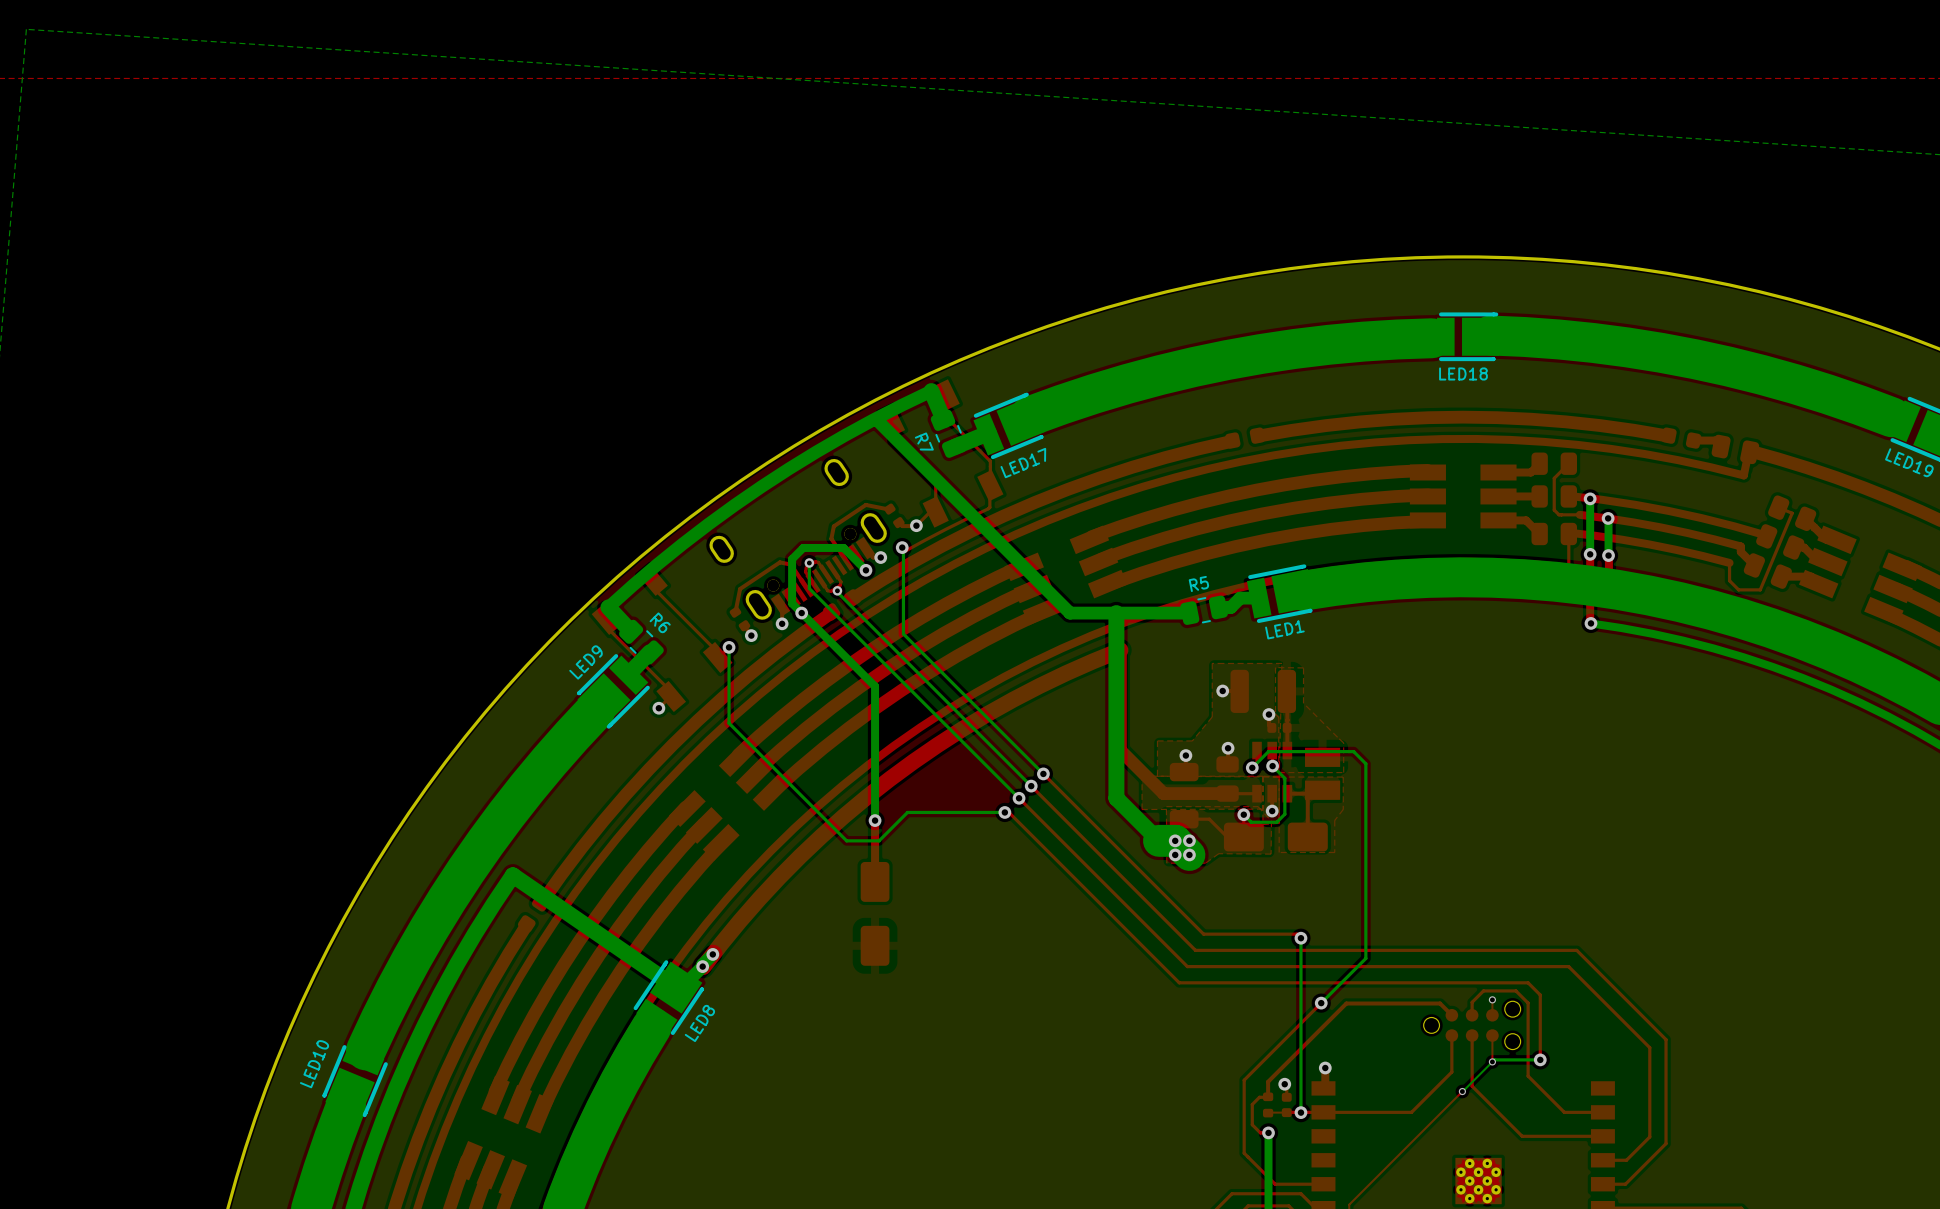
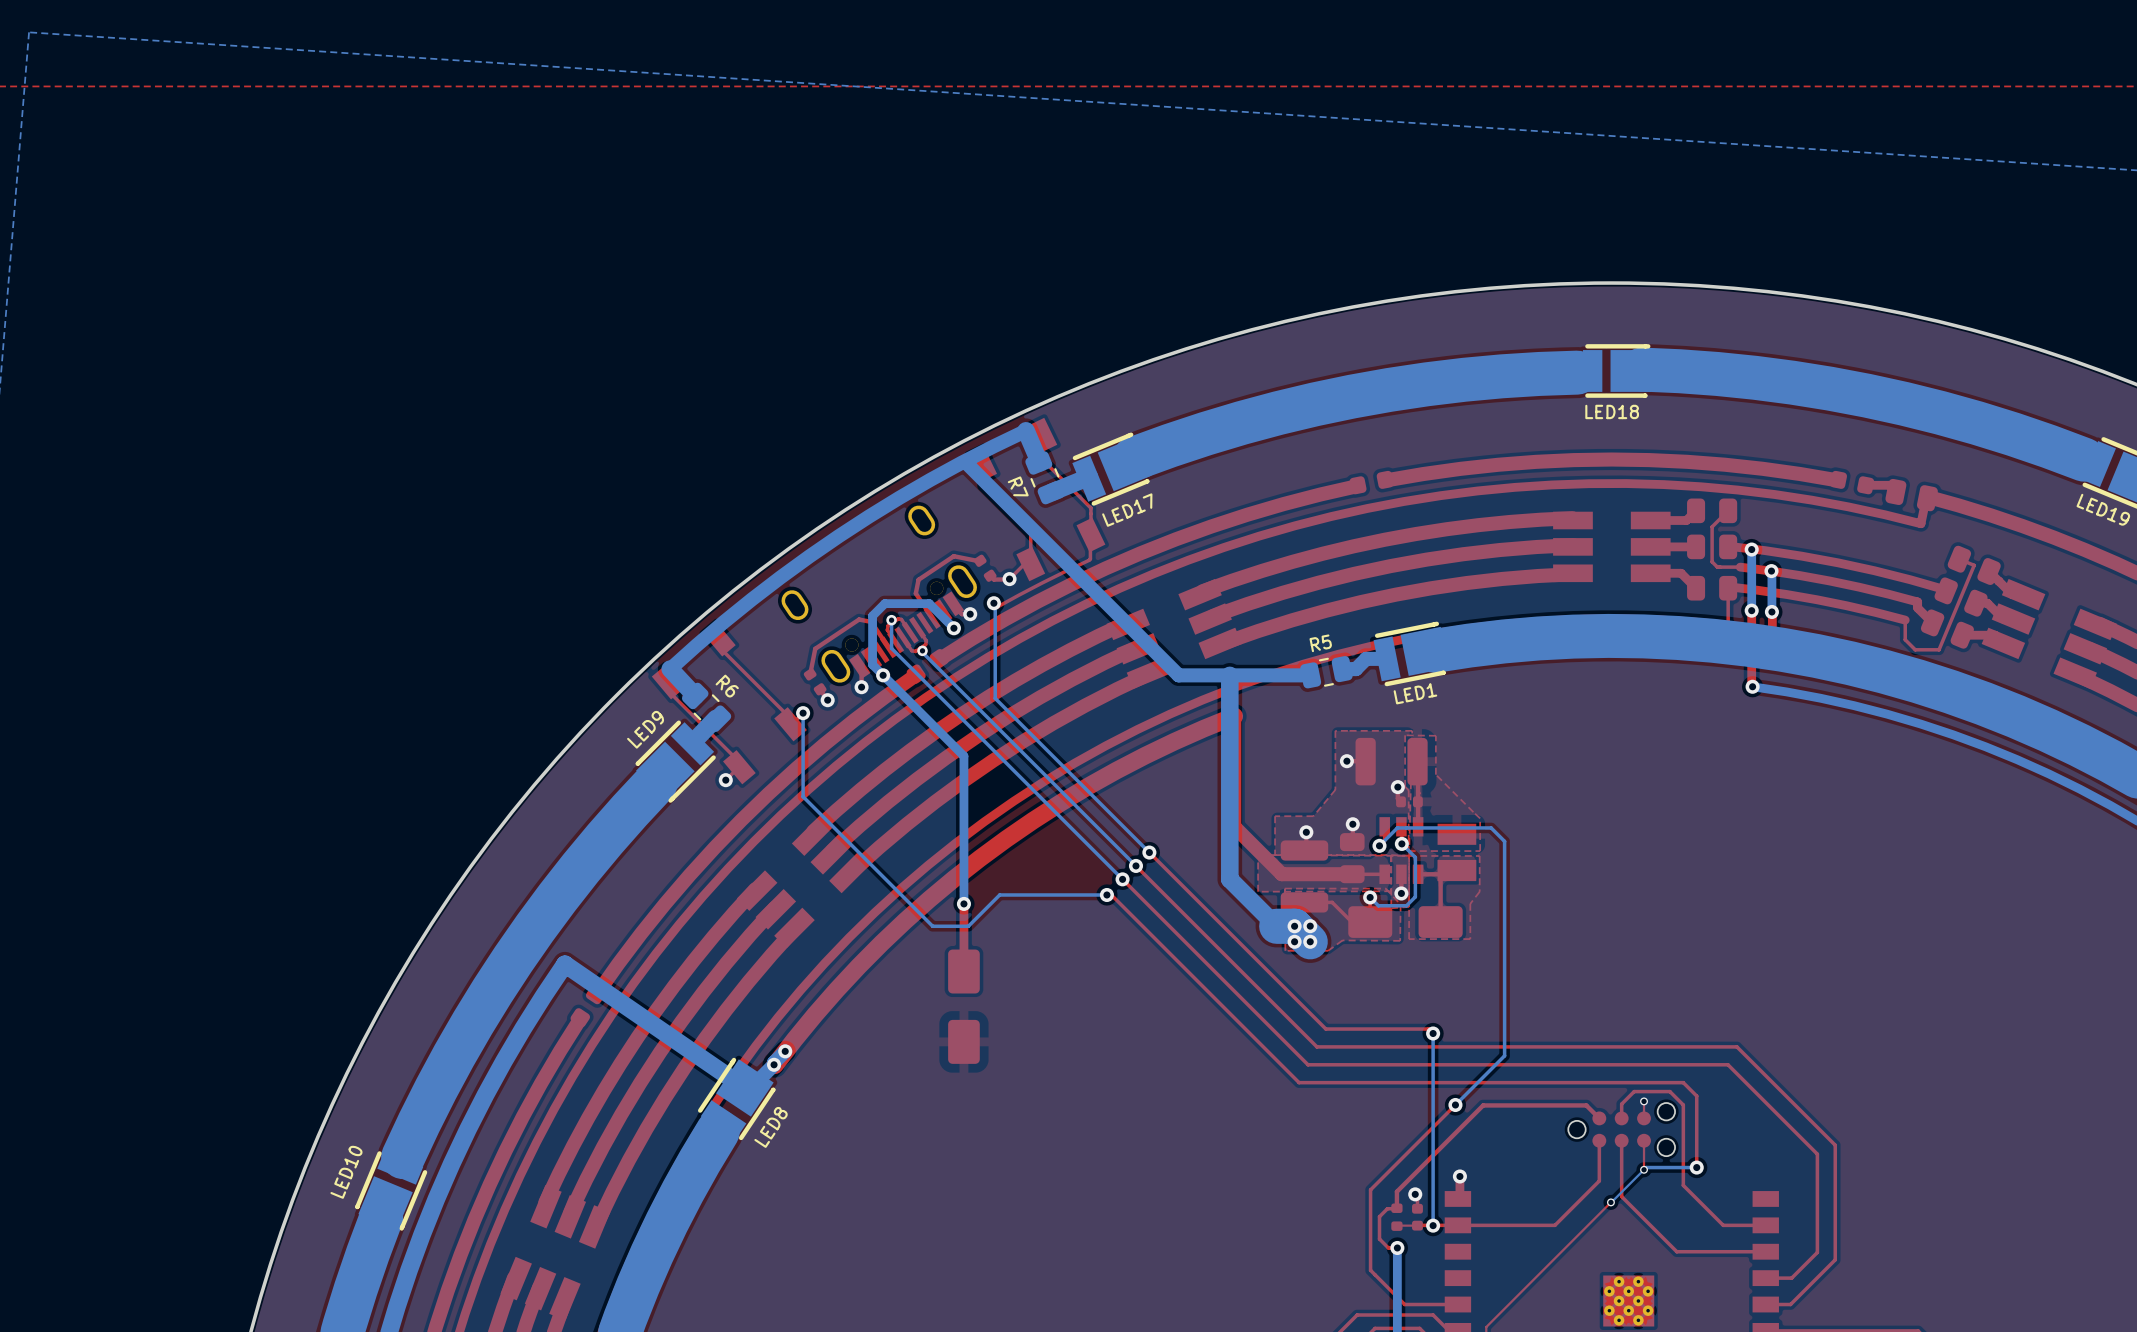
part footprint: [1169, 762, 1199, 829] -> [1280, 840, 1329, 913]

